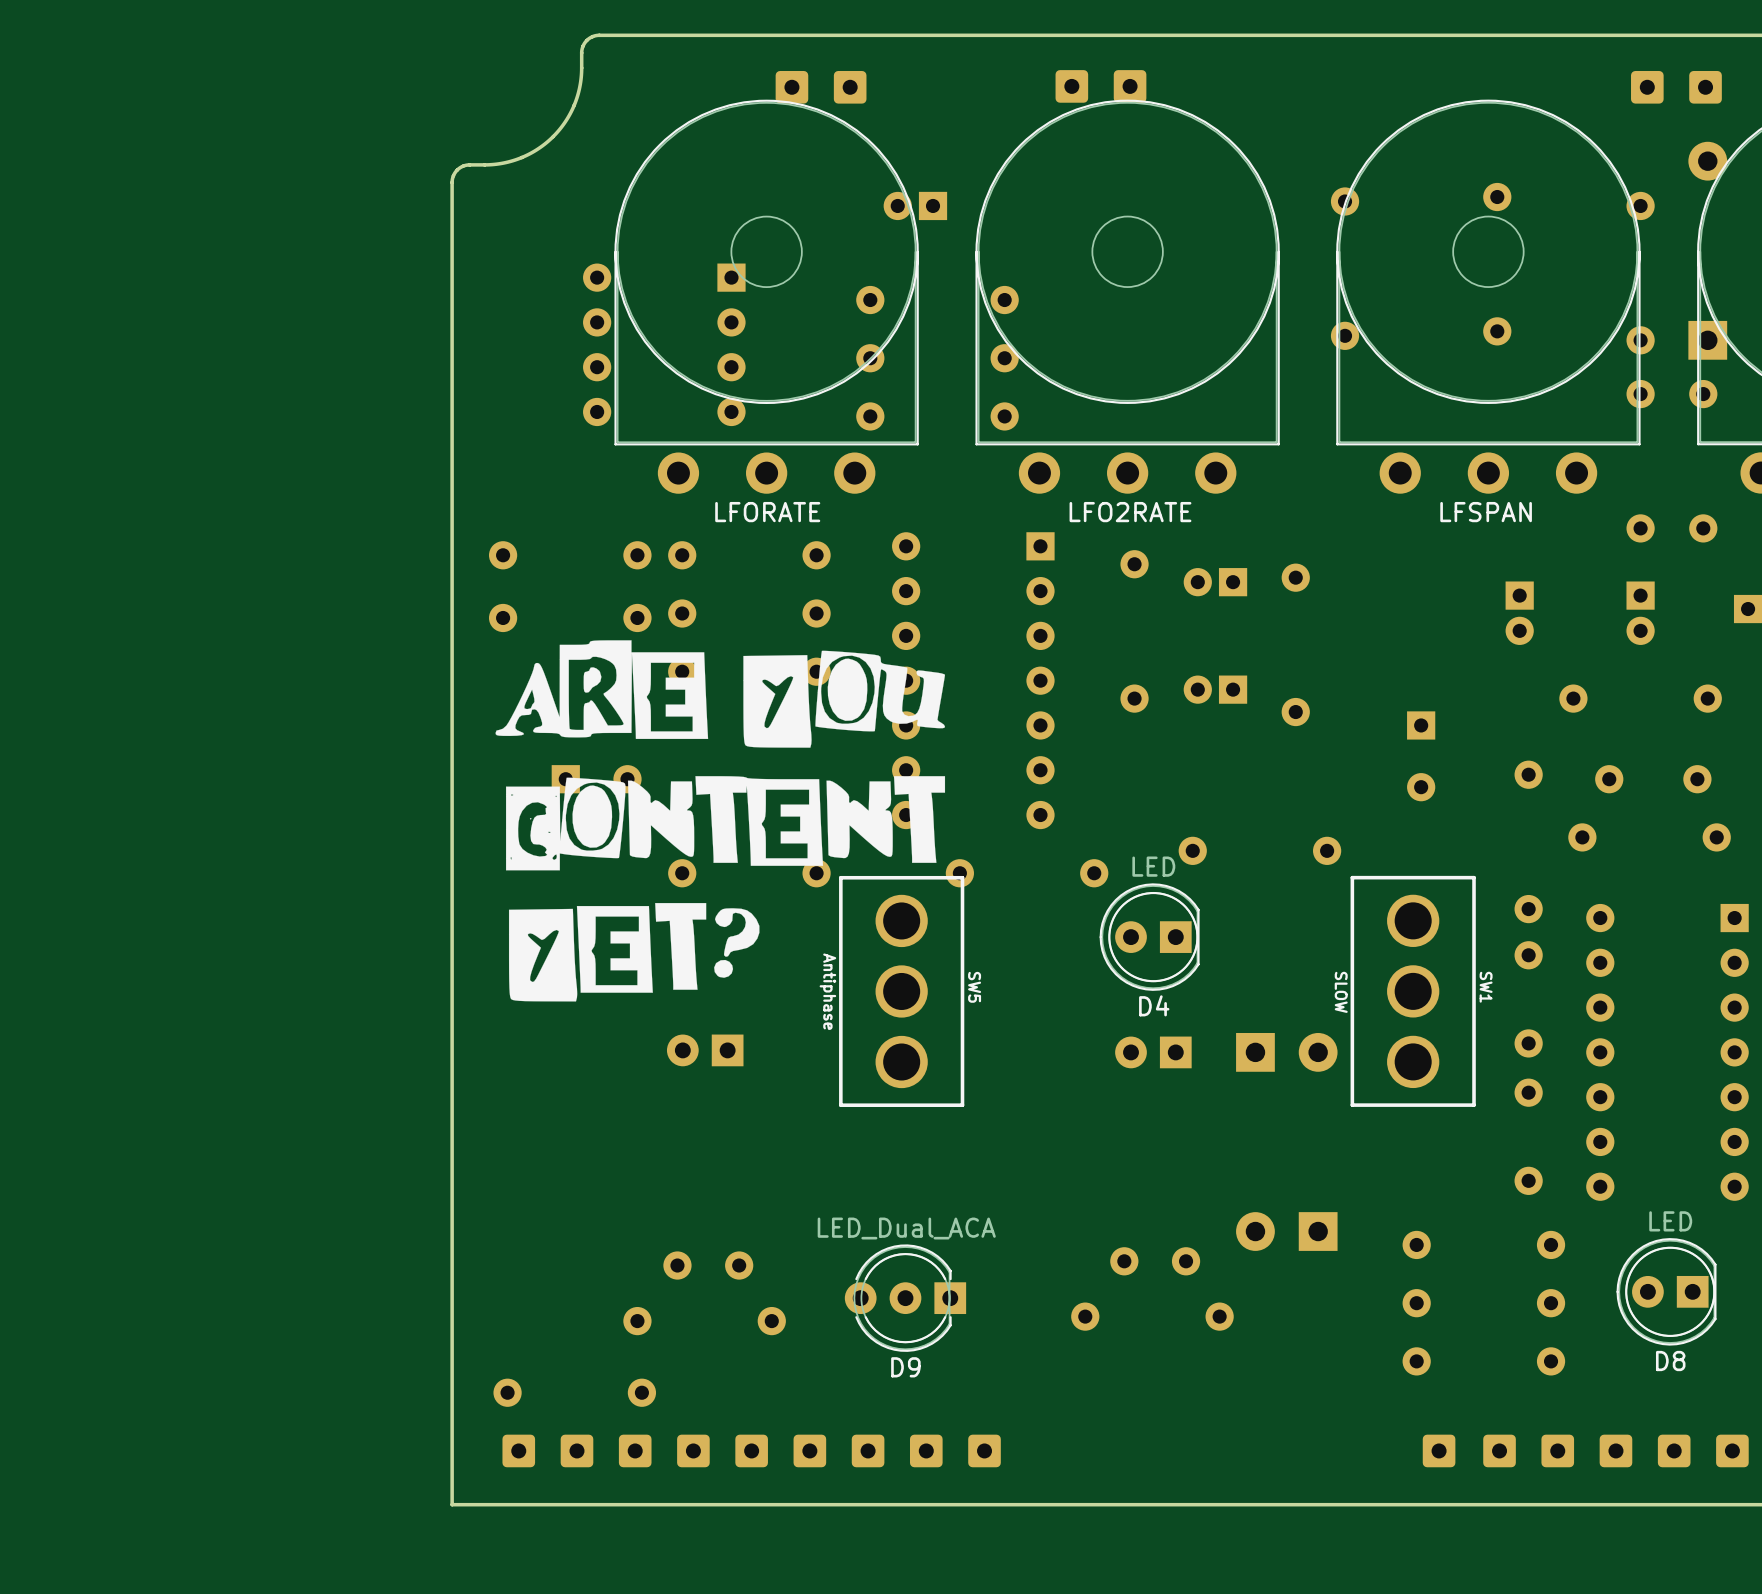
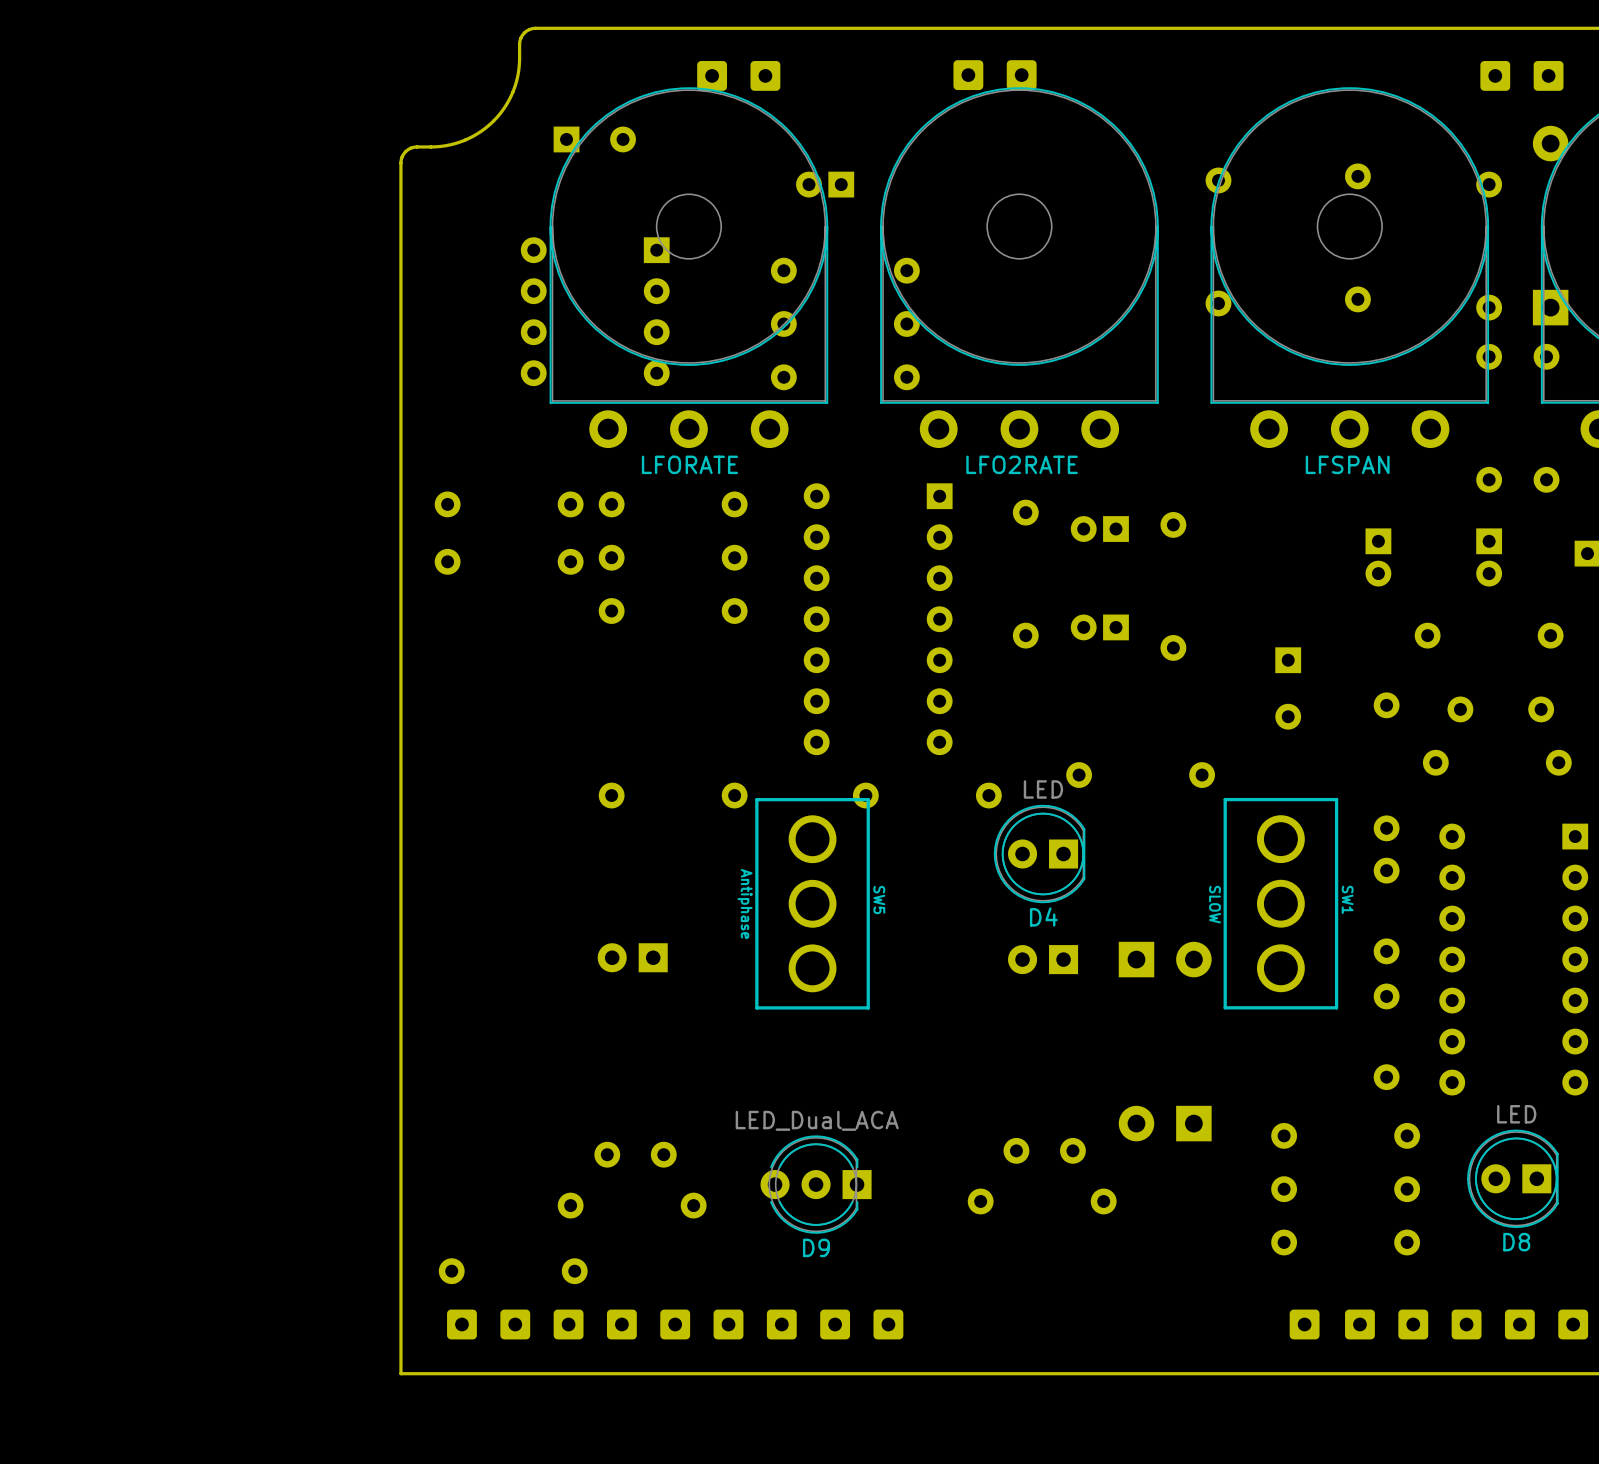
part: none -> (594, 139)
drawing: [495, 640, 946, 1002] -> none
part: (596, 779) -> none

